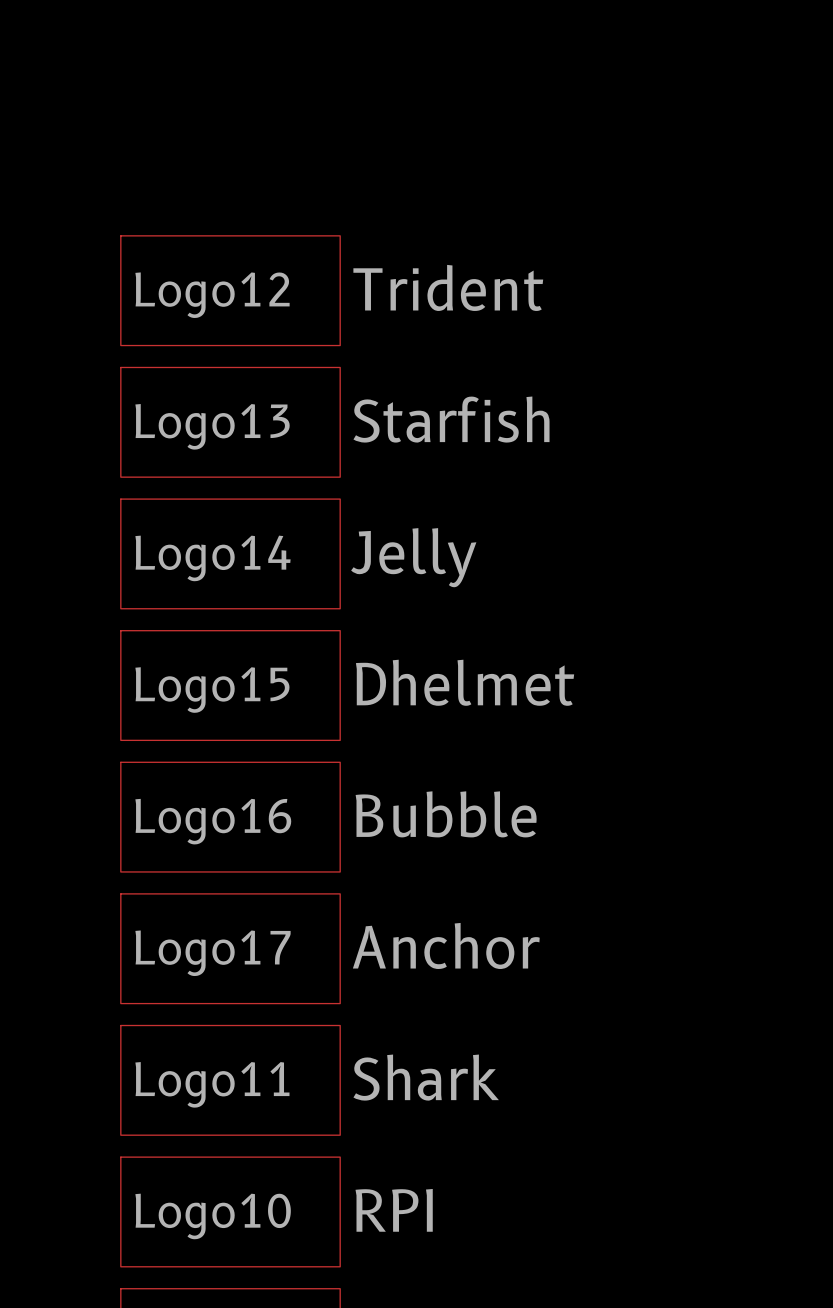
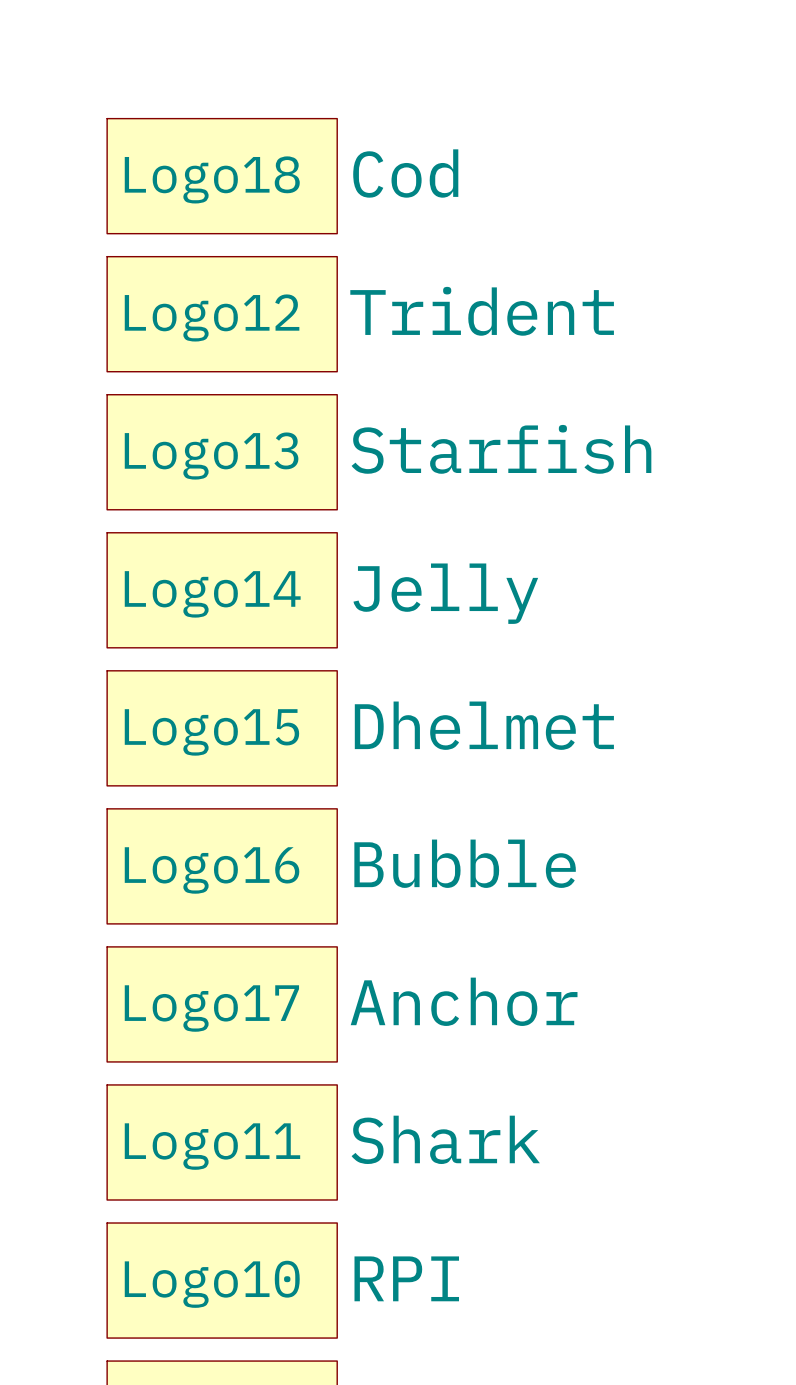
Logo18: none -> Cod (222, 176)

